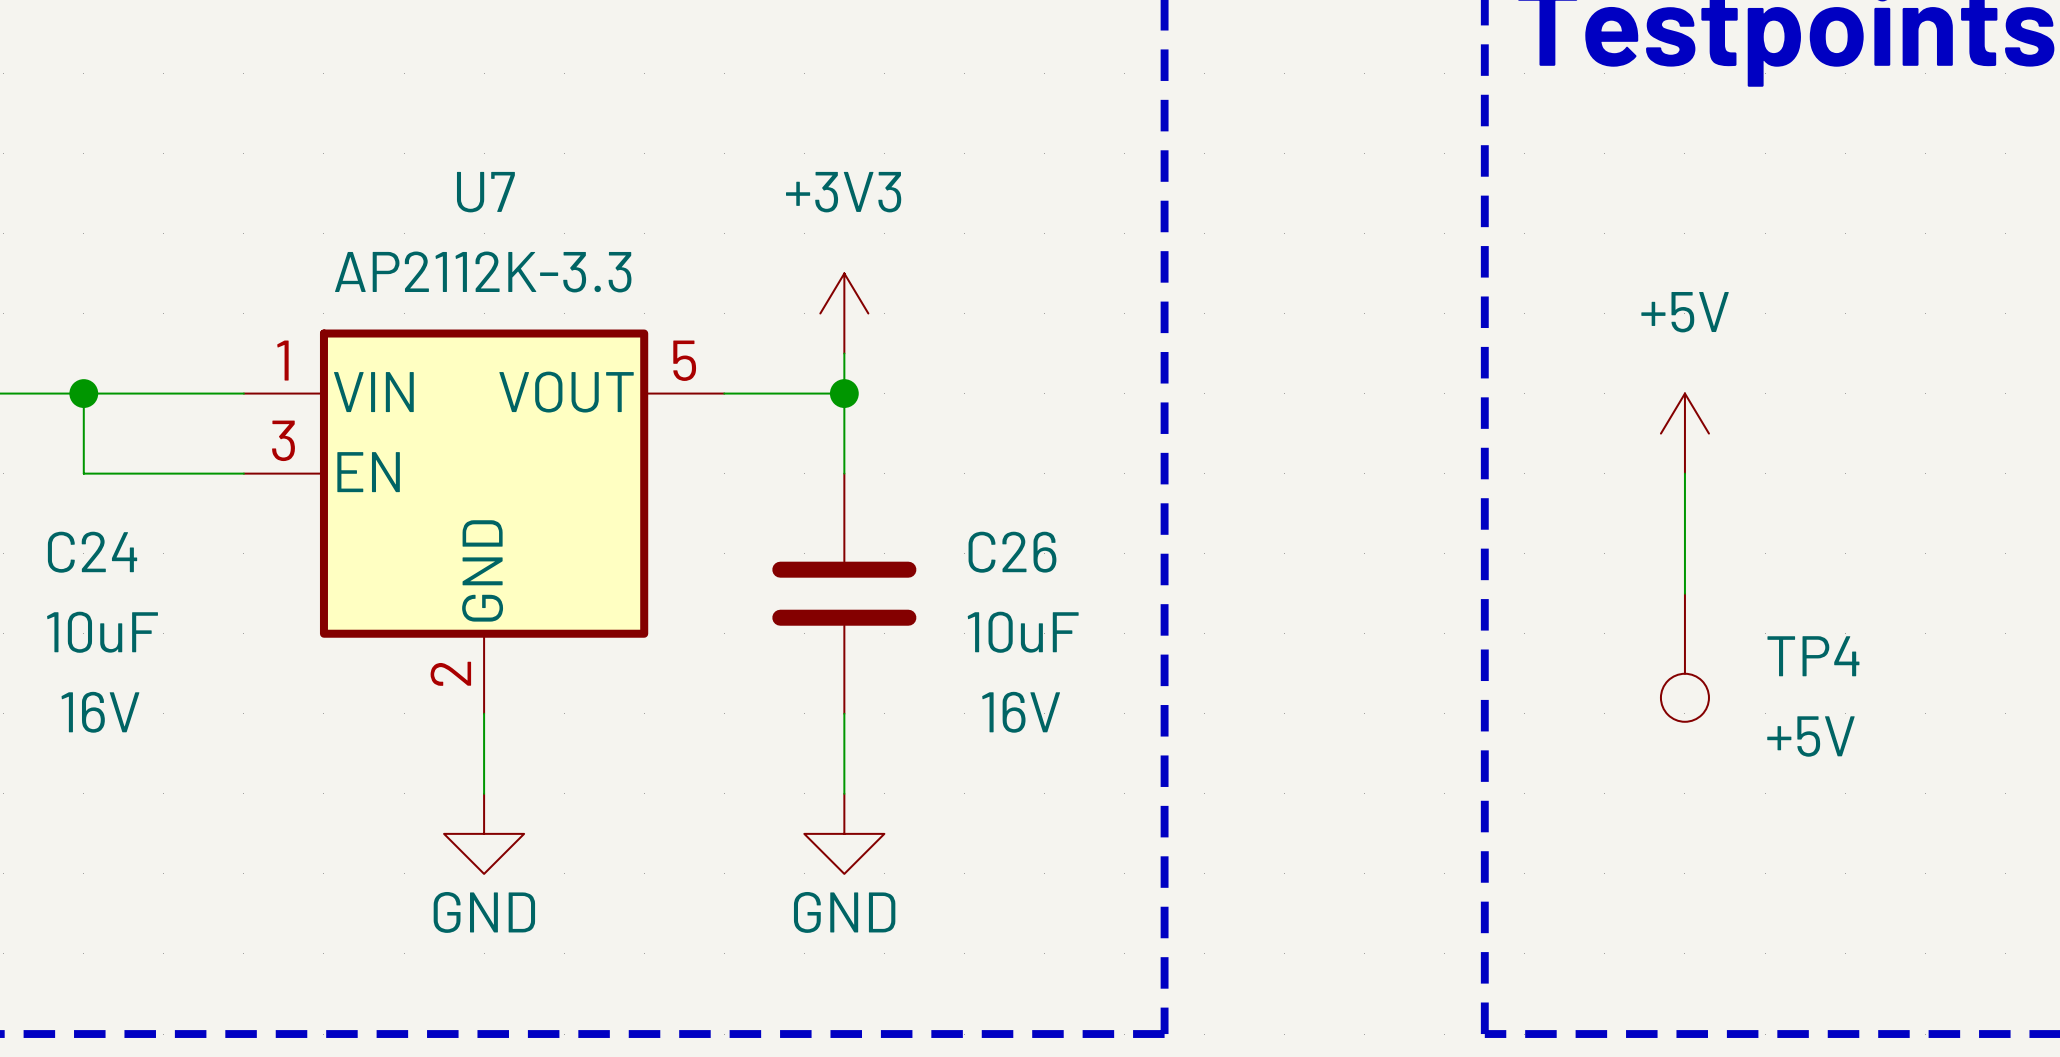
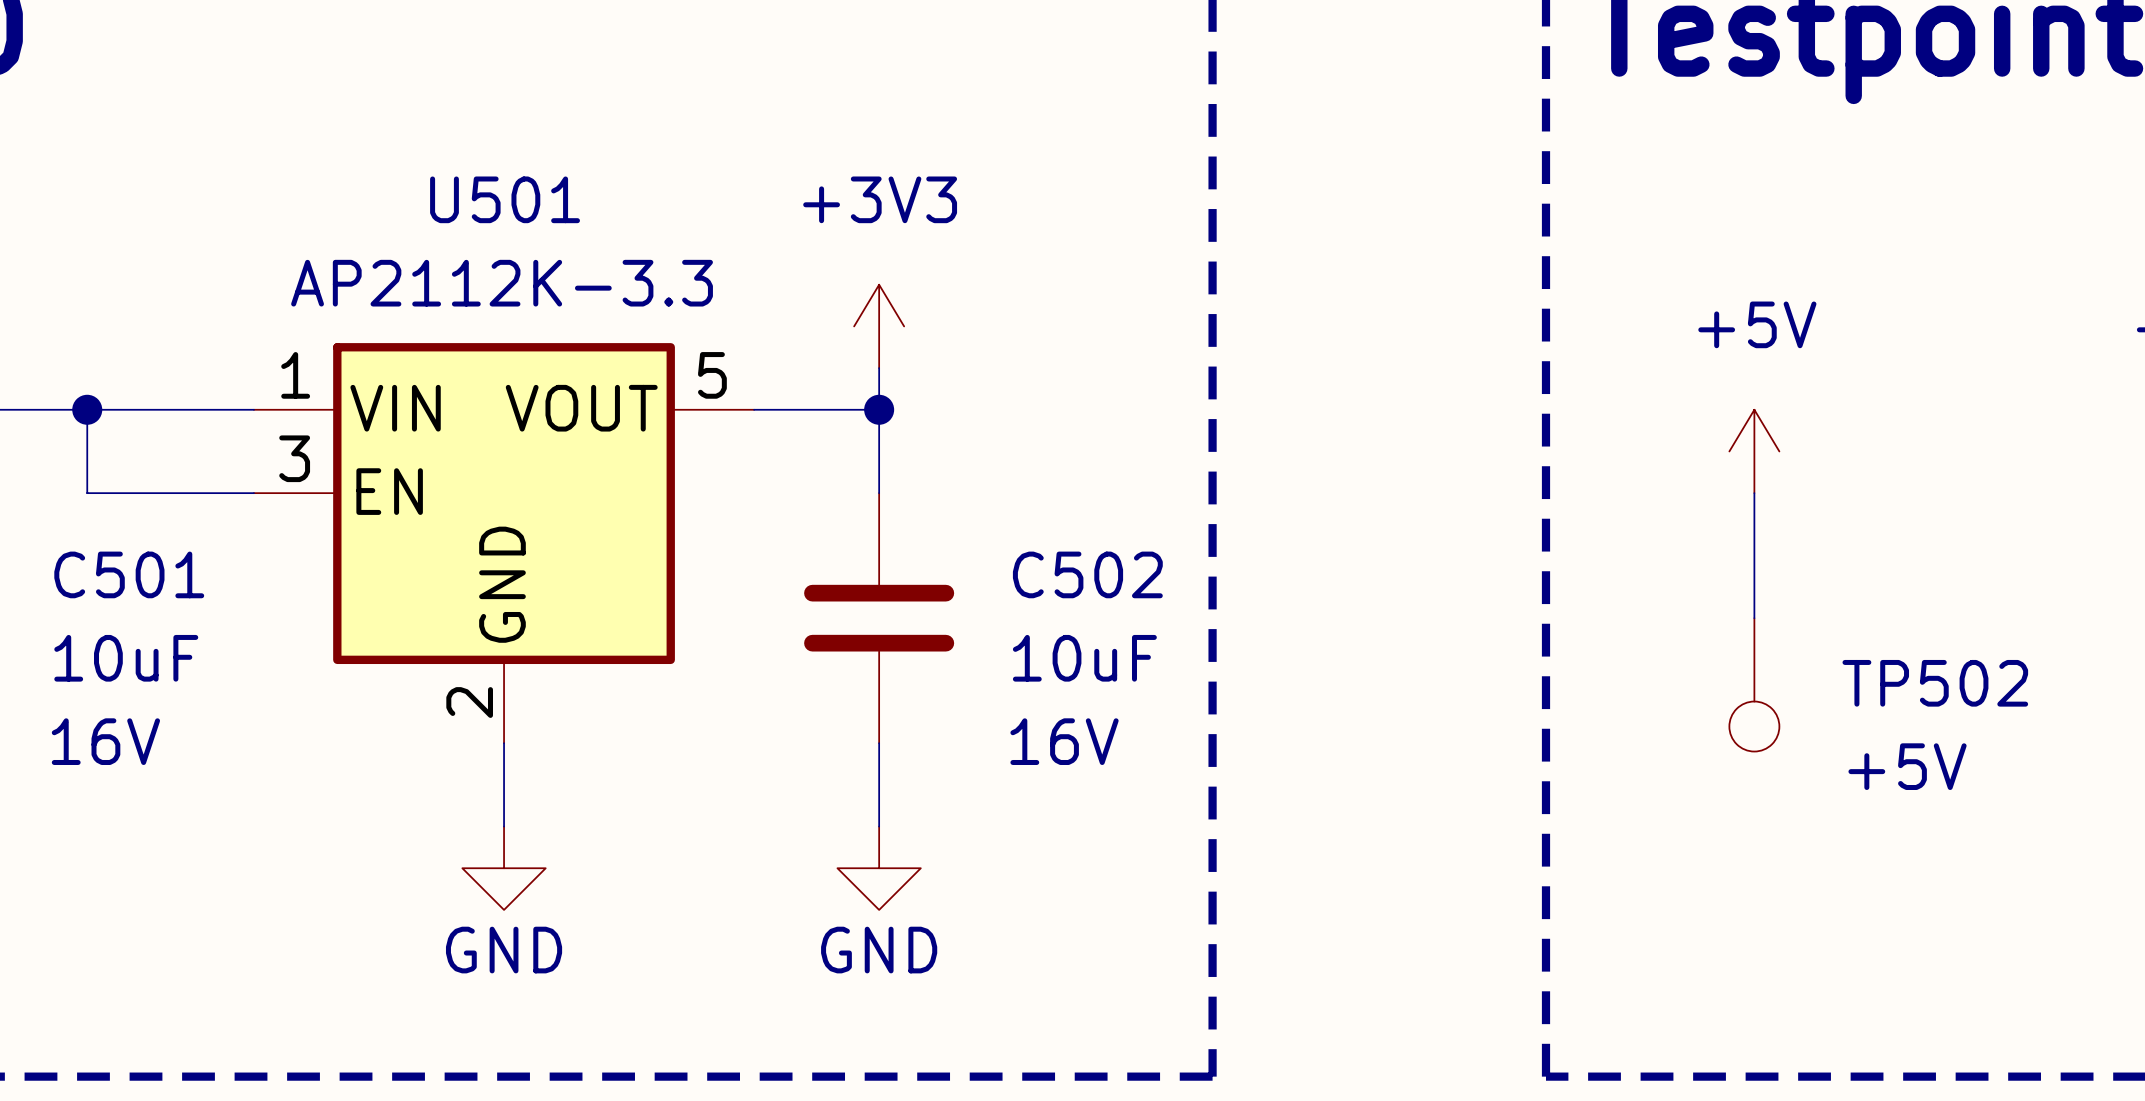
U7 name: U7 (485, 192) -> U501 (505, 199)
C24 name: C24 (92, 552) -> C501 (129, 574)
C26 name: C26 (1012, 552) -> C502 (1087, 574)
TP4 name: TP4 (1813, 656) -> TP502 (1935, 683)

